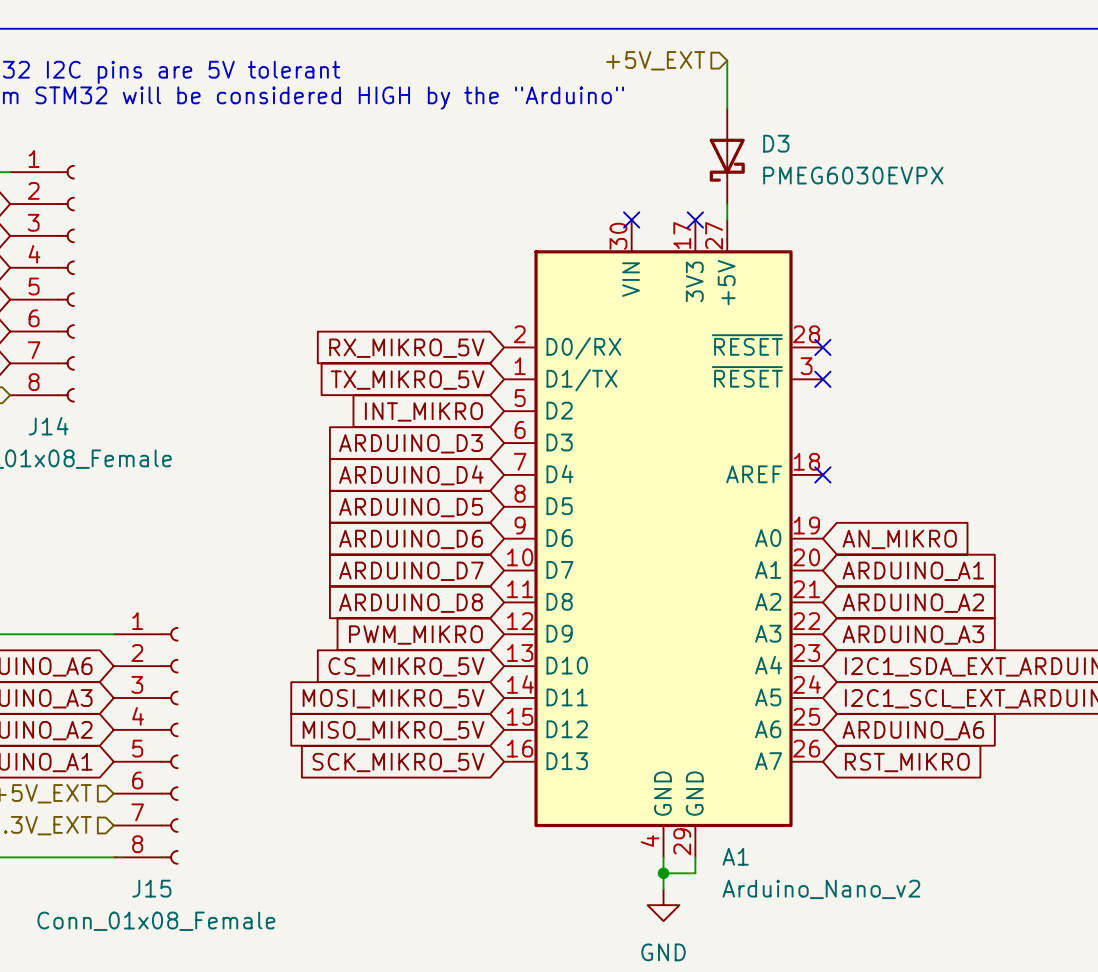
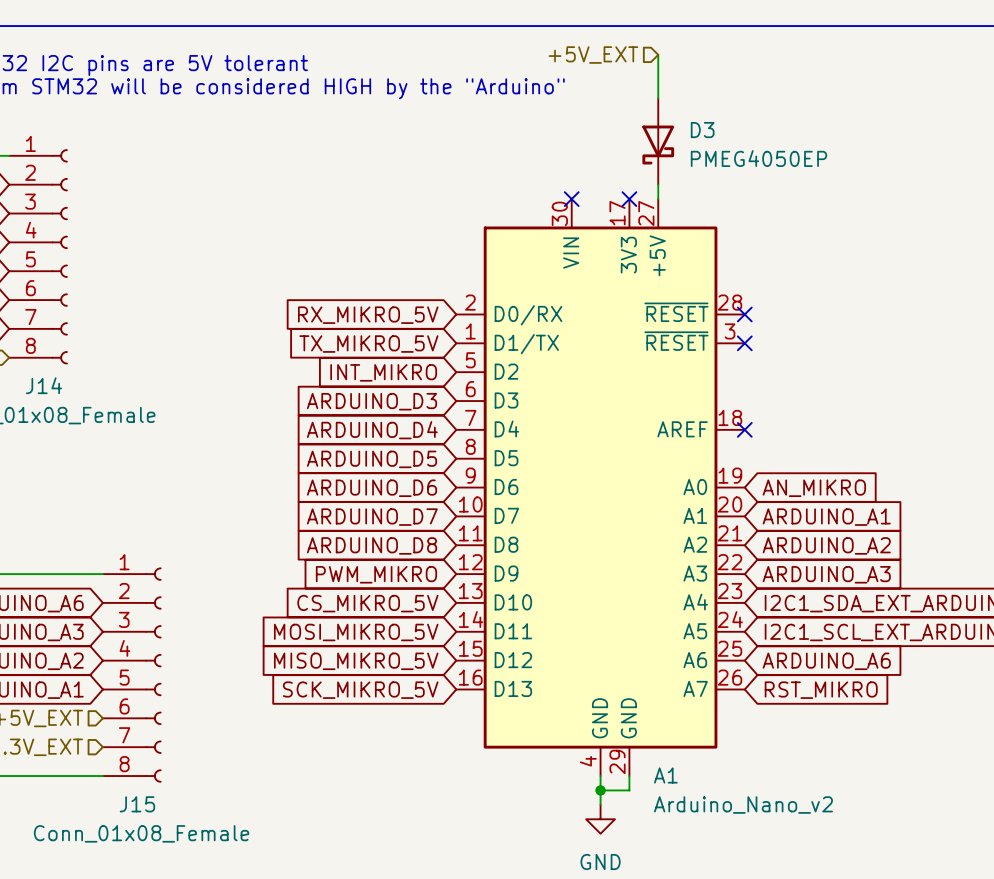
D3 value: PMEG6030EVPX (853, 175) -> PMEG4050EP (758, 158)

